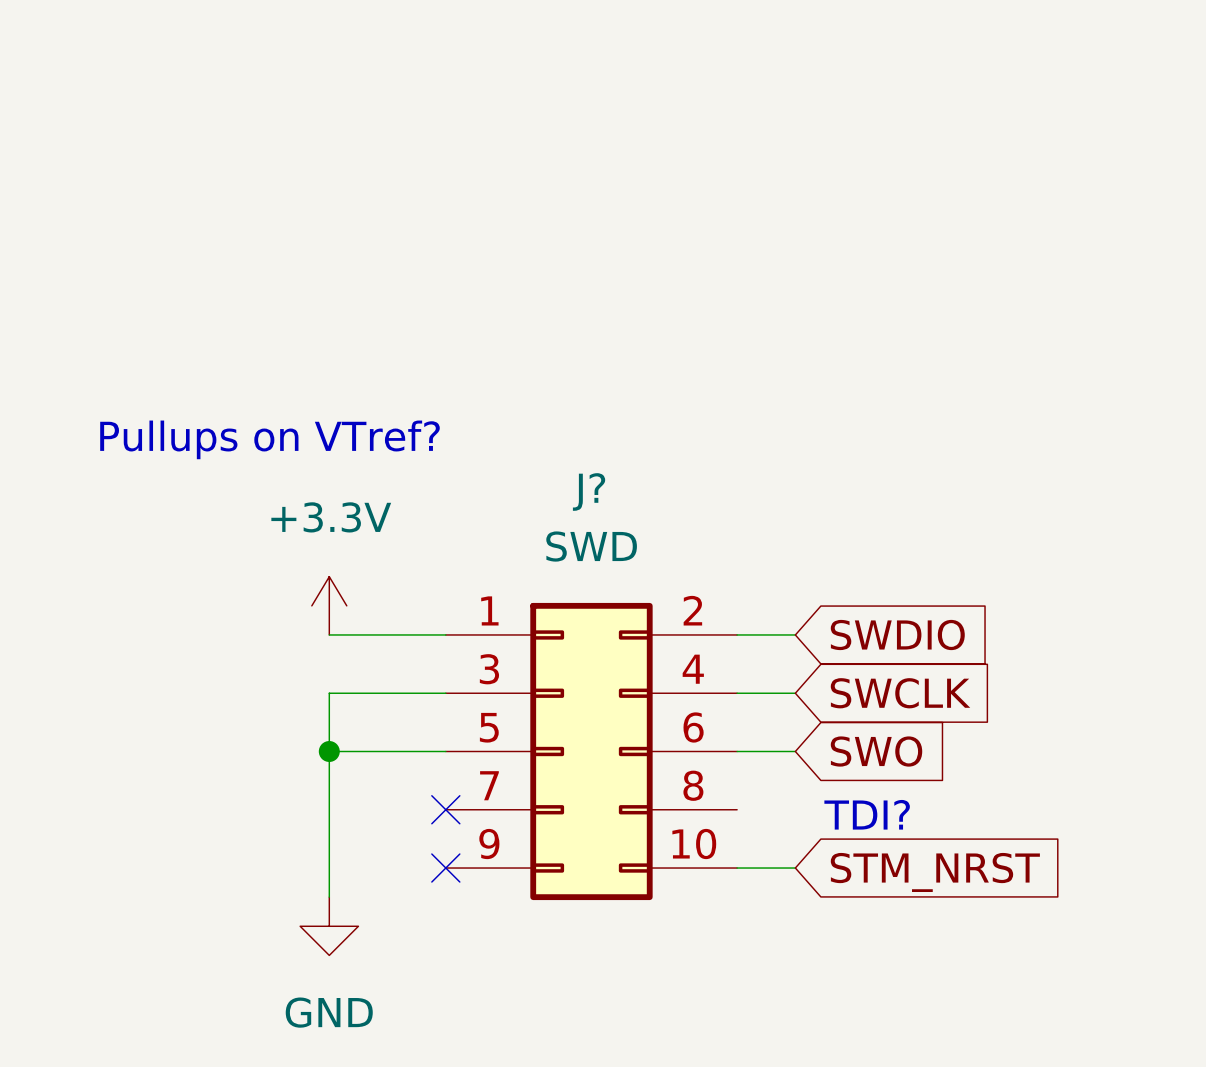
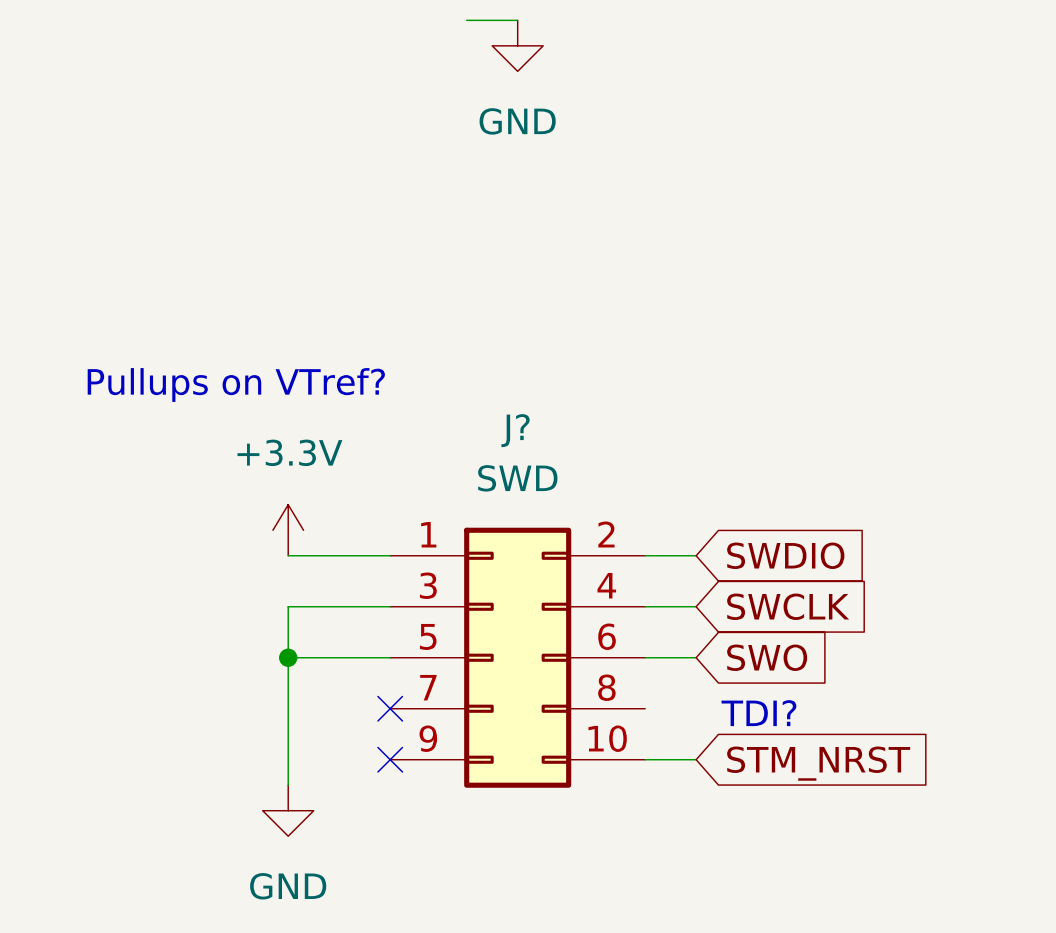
wire: none -> (466, 20) (517, 20)
power symbol: none -> GND (517, 45)

